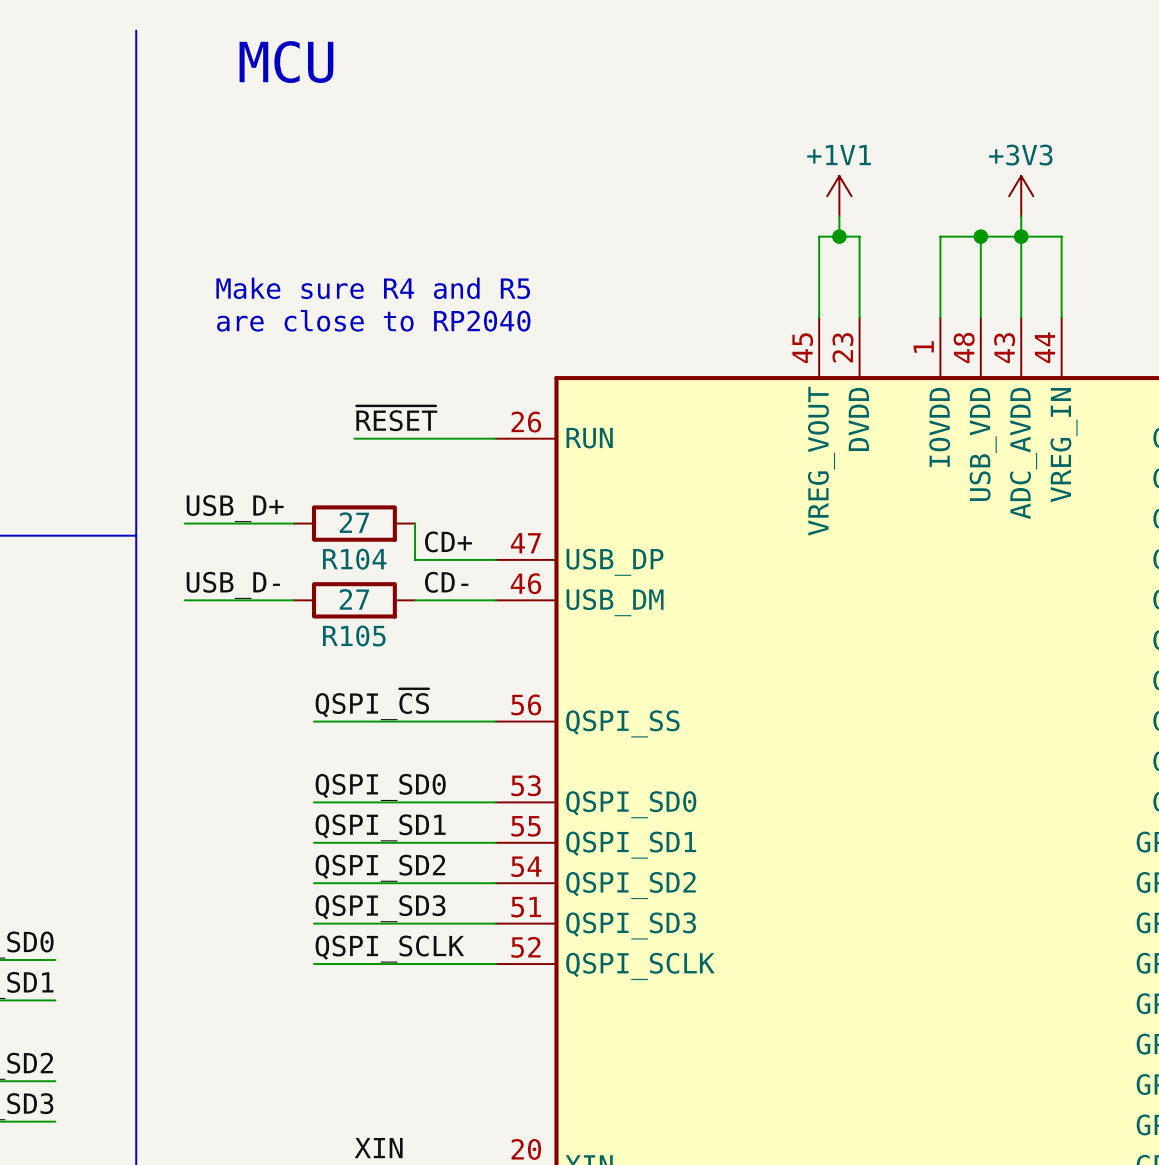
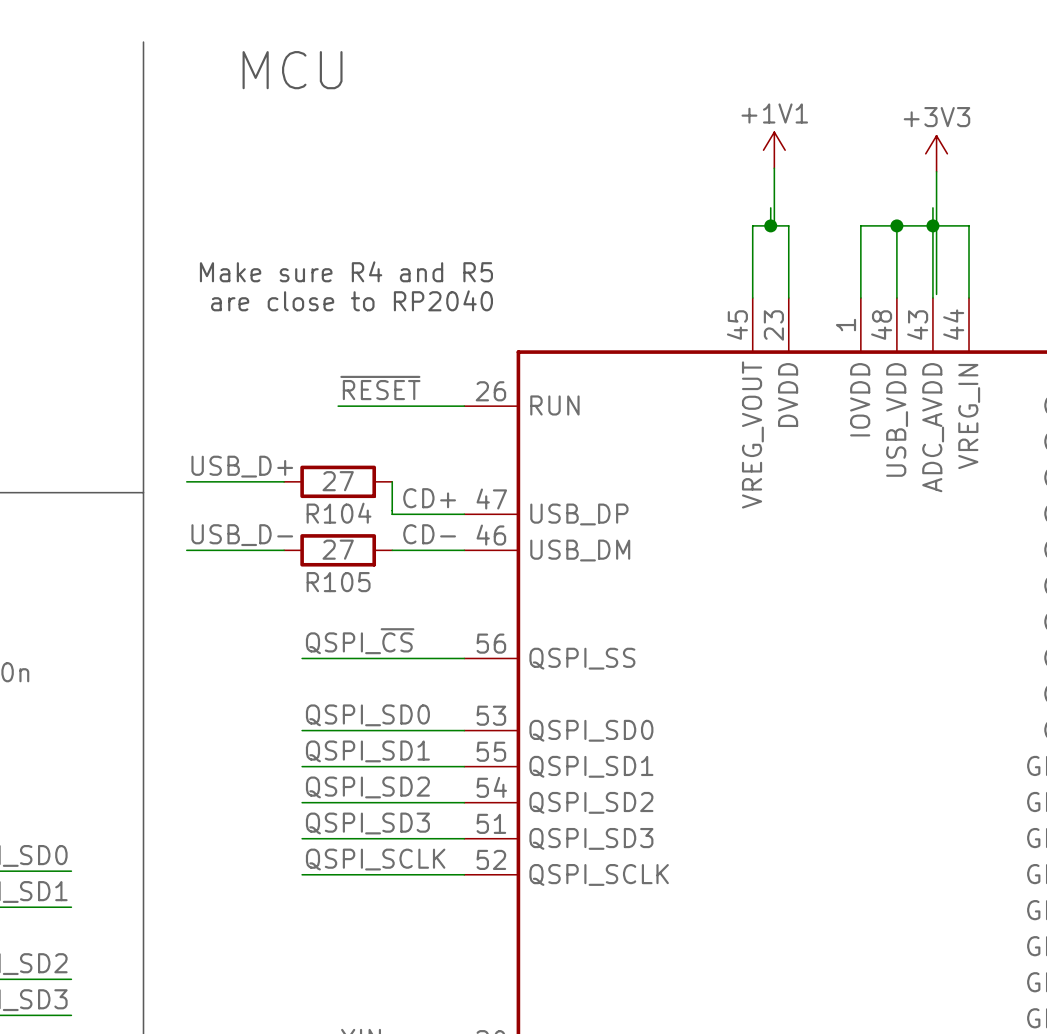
wire: none -> (774, 168) (774, 222)
wire: none -> (936, 171) (936, 294)
power symbol position: +1V1 (839, 196) -> +1V1 (774, 150)
power symbol position: +3V3 (1021, 196) -> +3V3 (936, 153)

